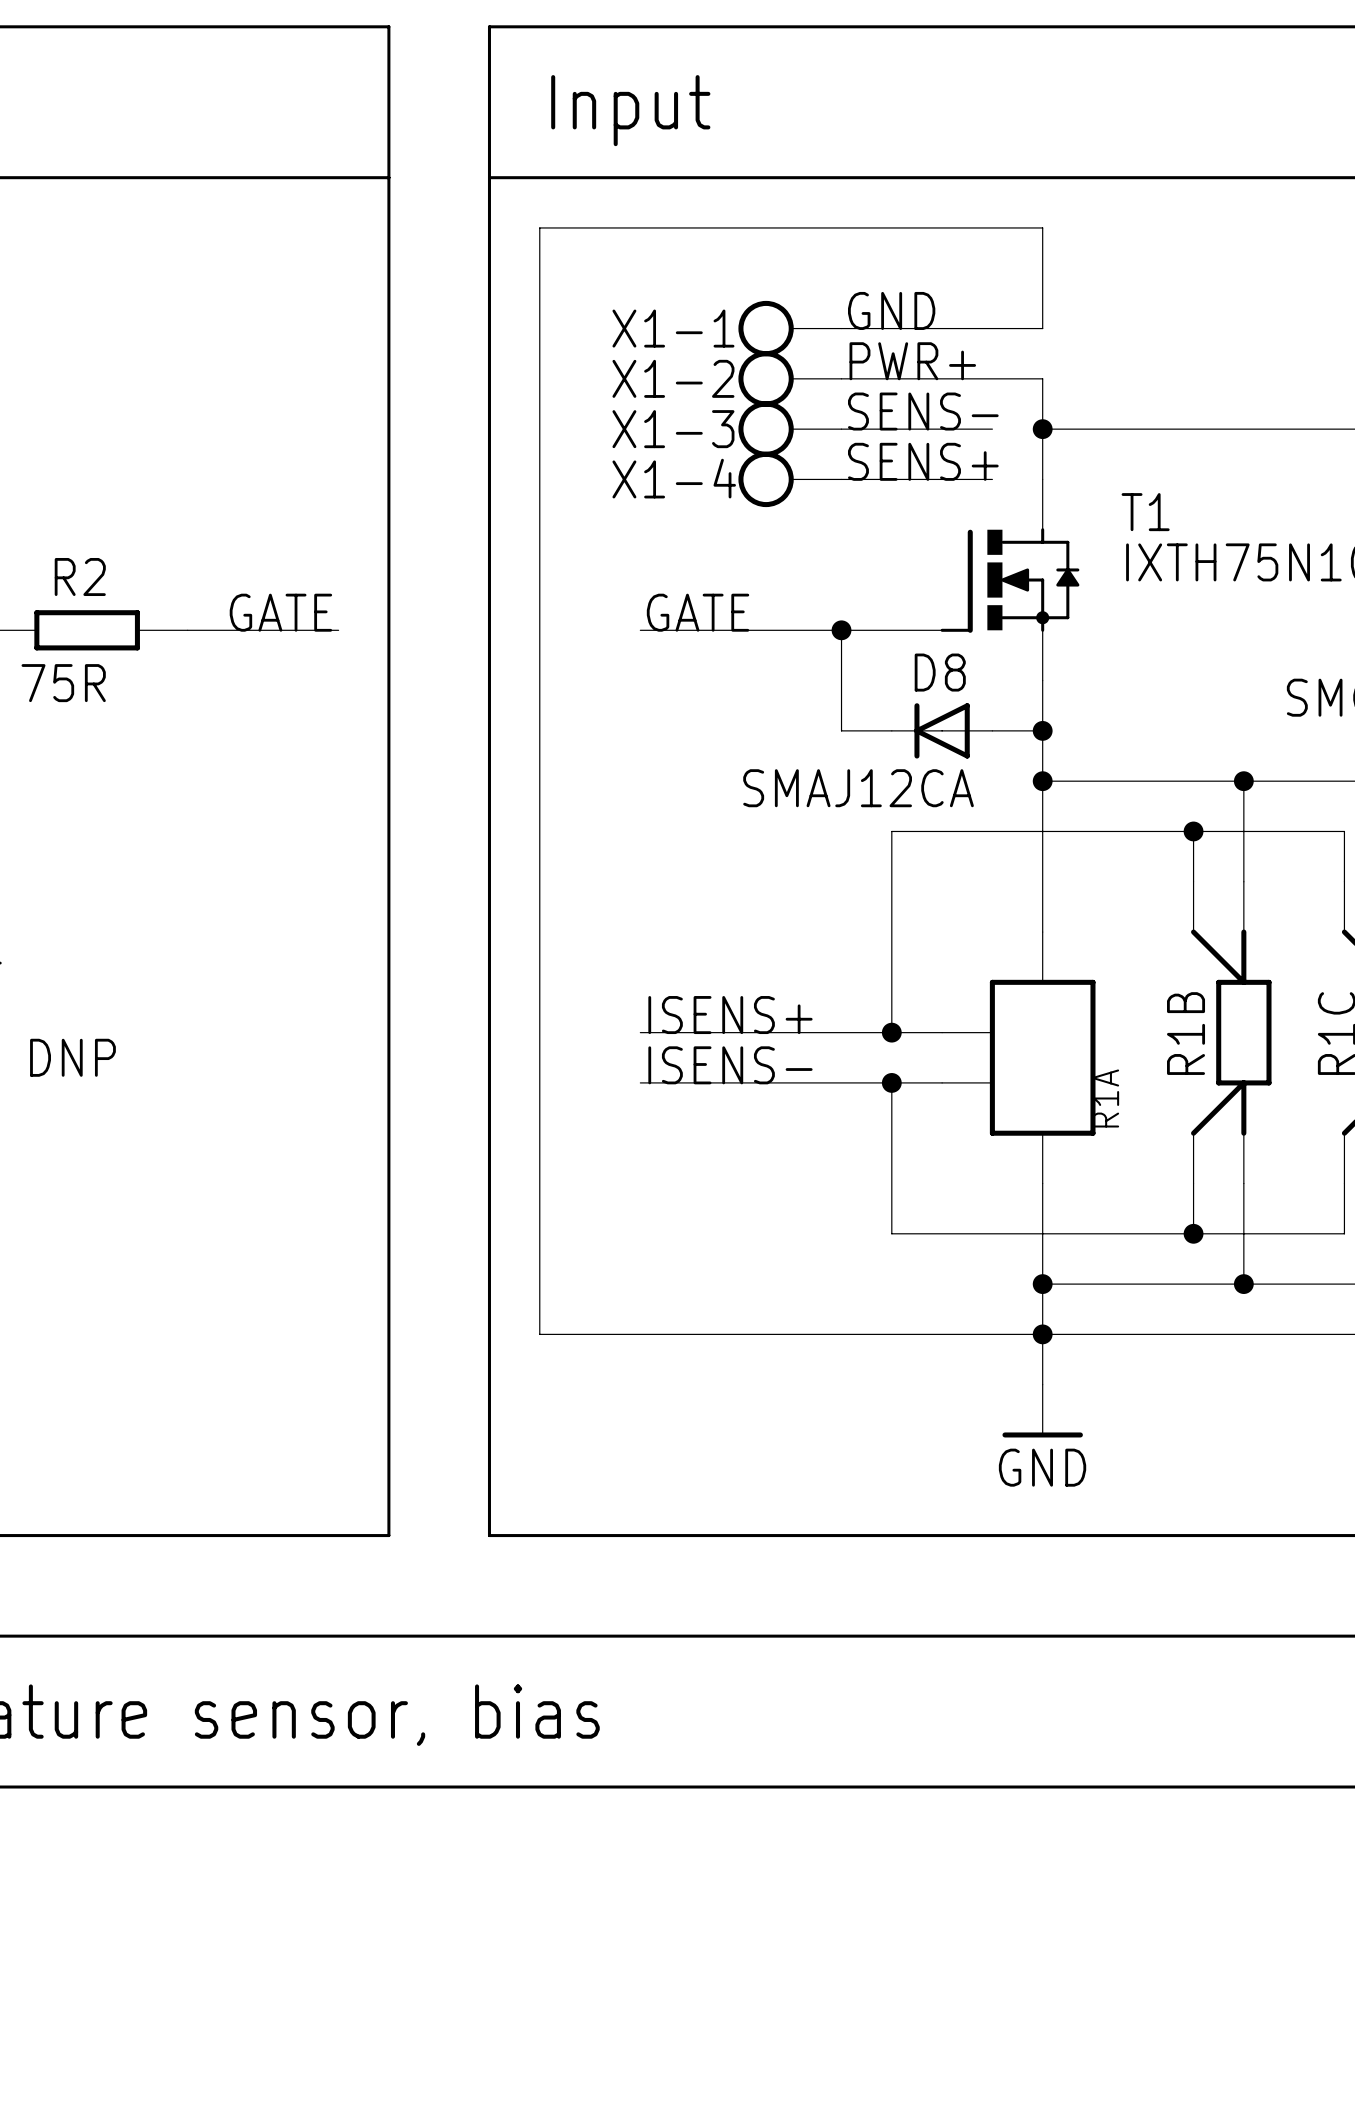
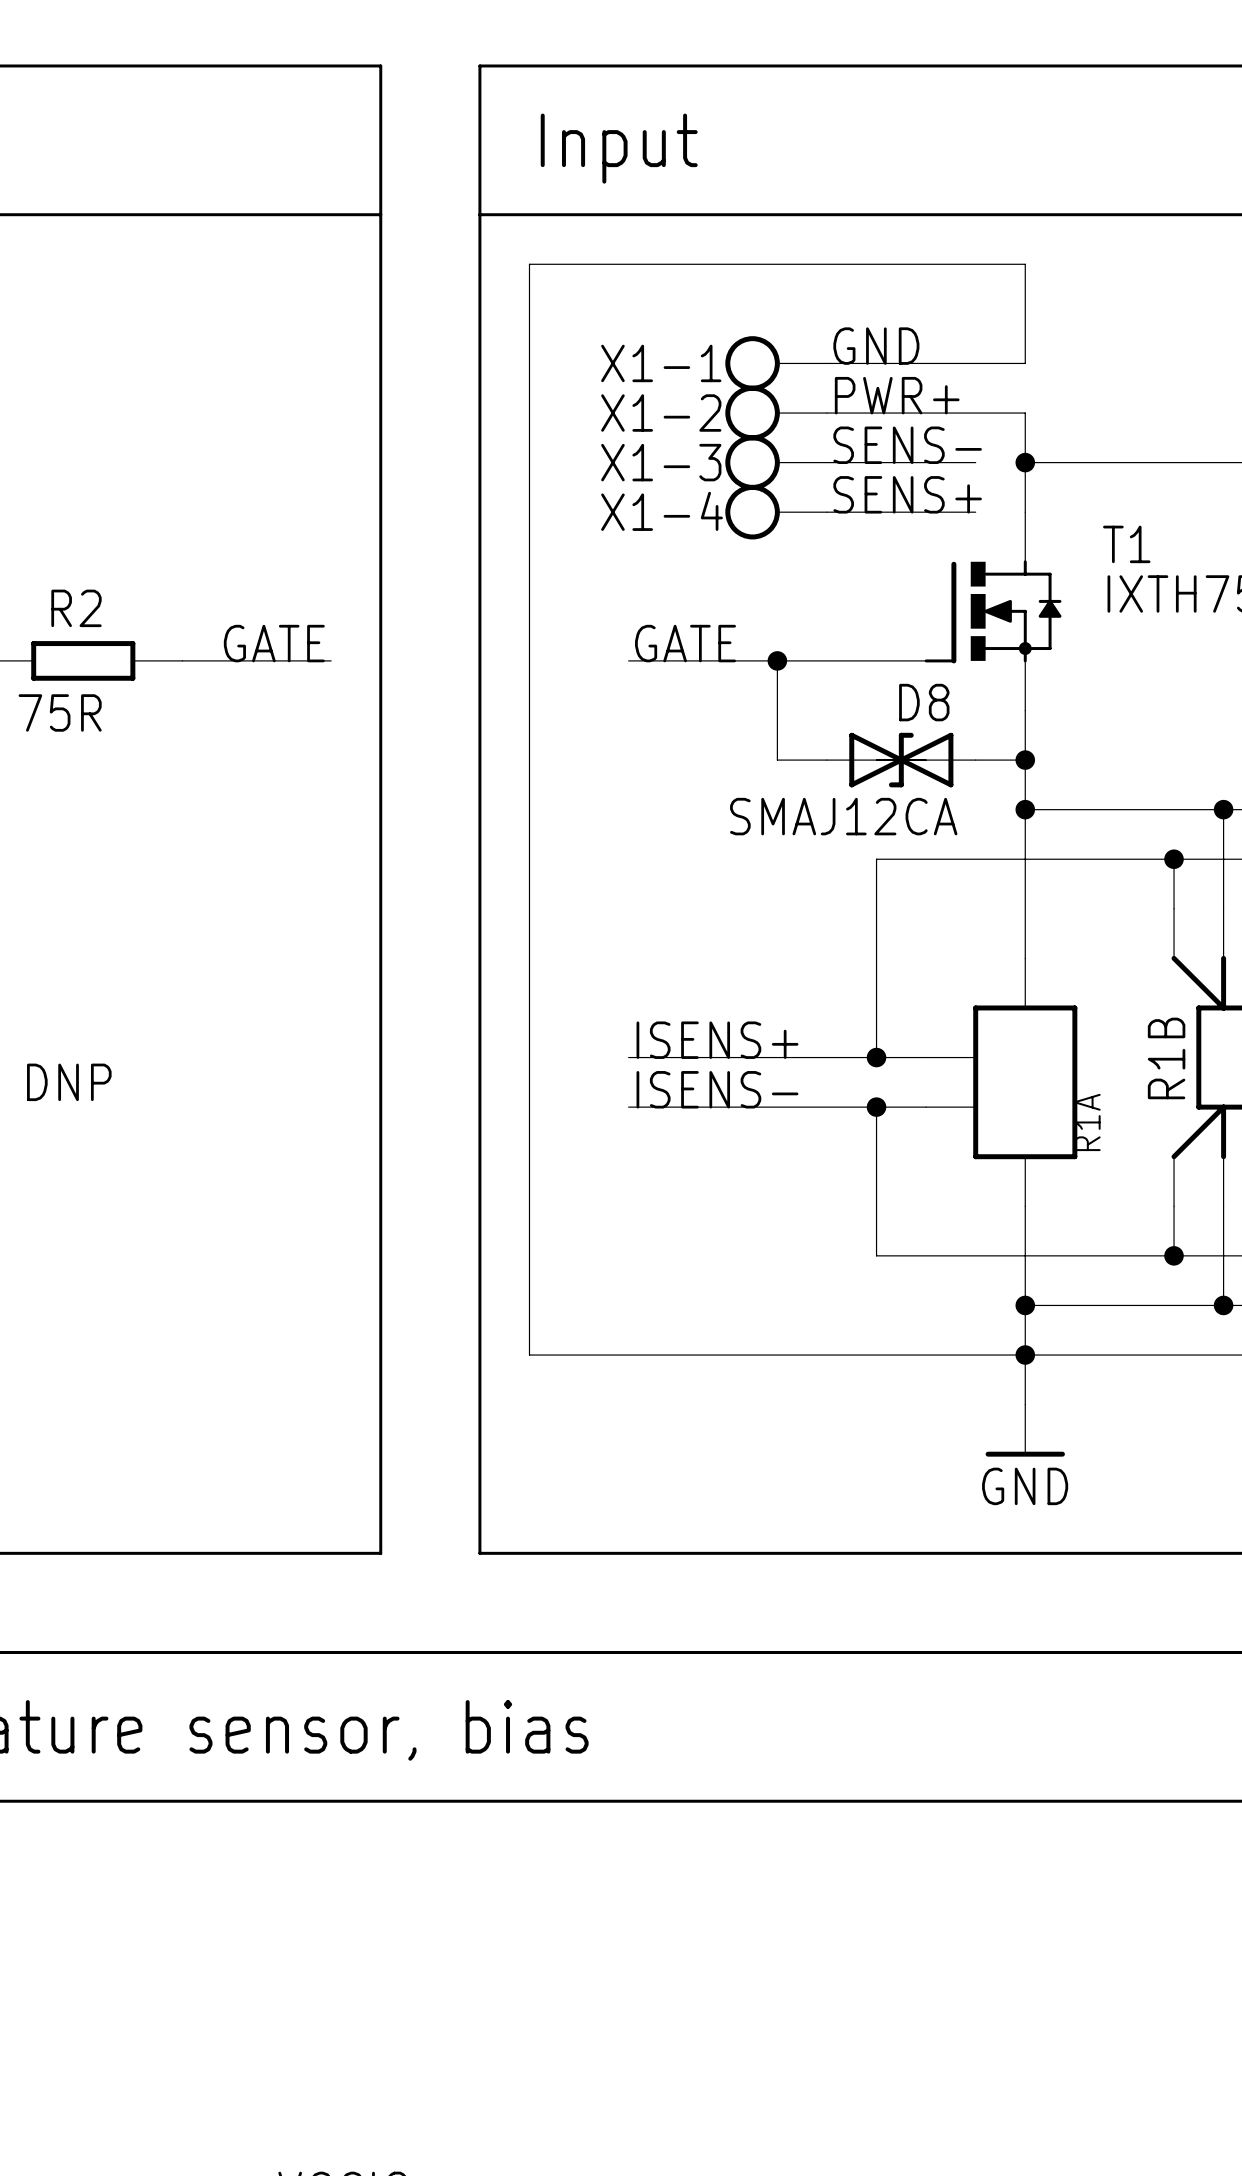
wire: (841, 630) (841, 730) (891, 730) -> (777, 660) (777, 760) (826, 760)
junction position: (841, 630) -> (777, 660)
D8 symbol: [891, 703, 993, 759] -> [826, 732, 976, 788]

